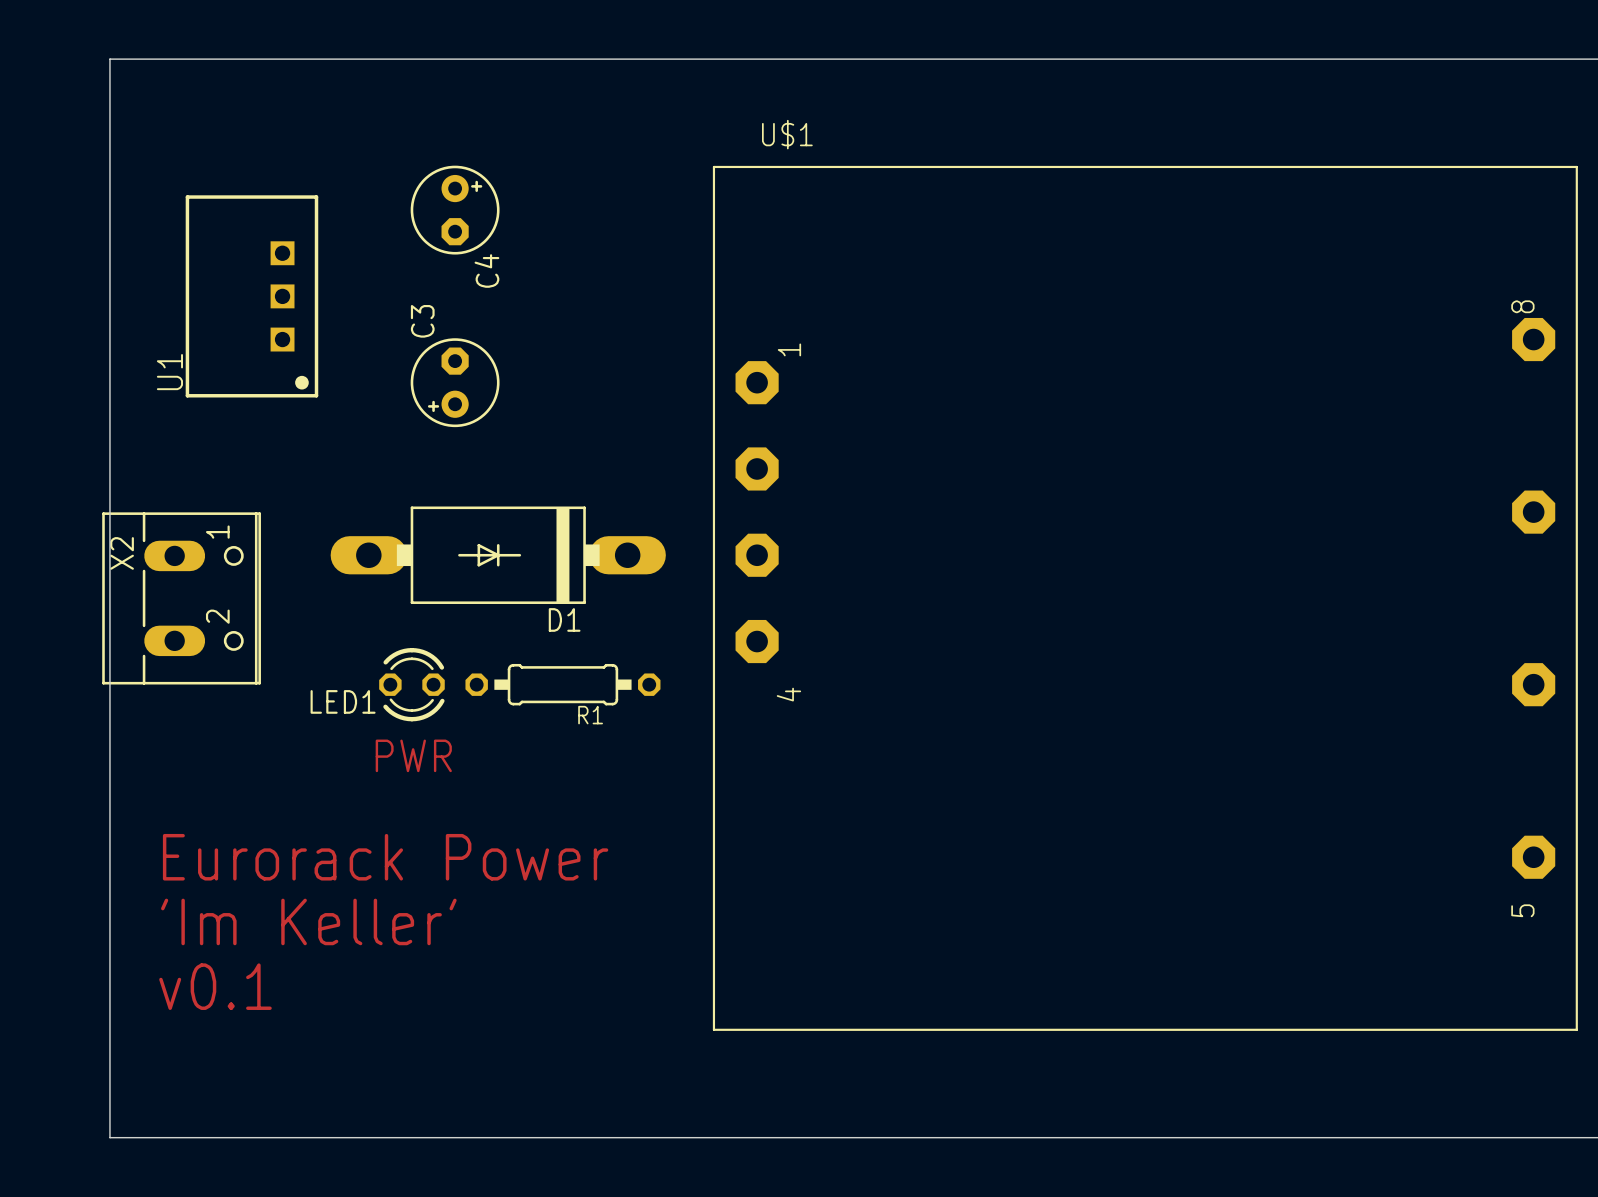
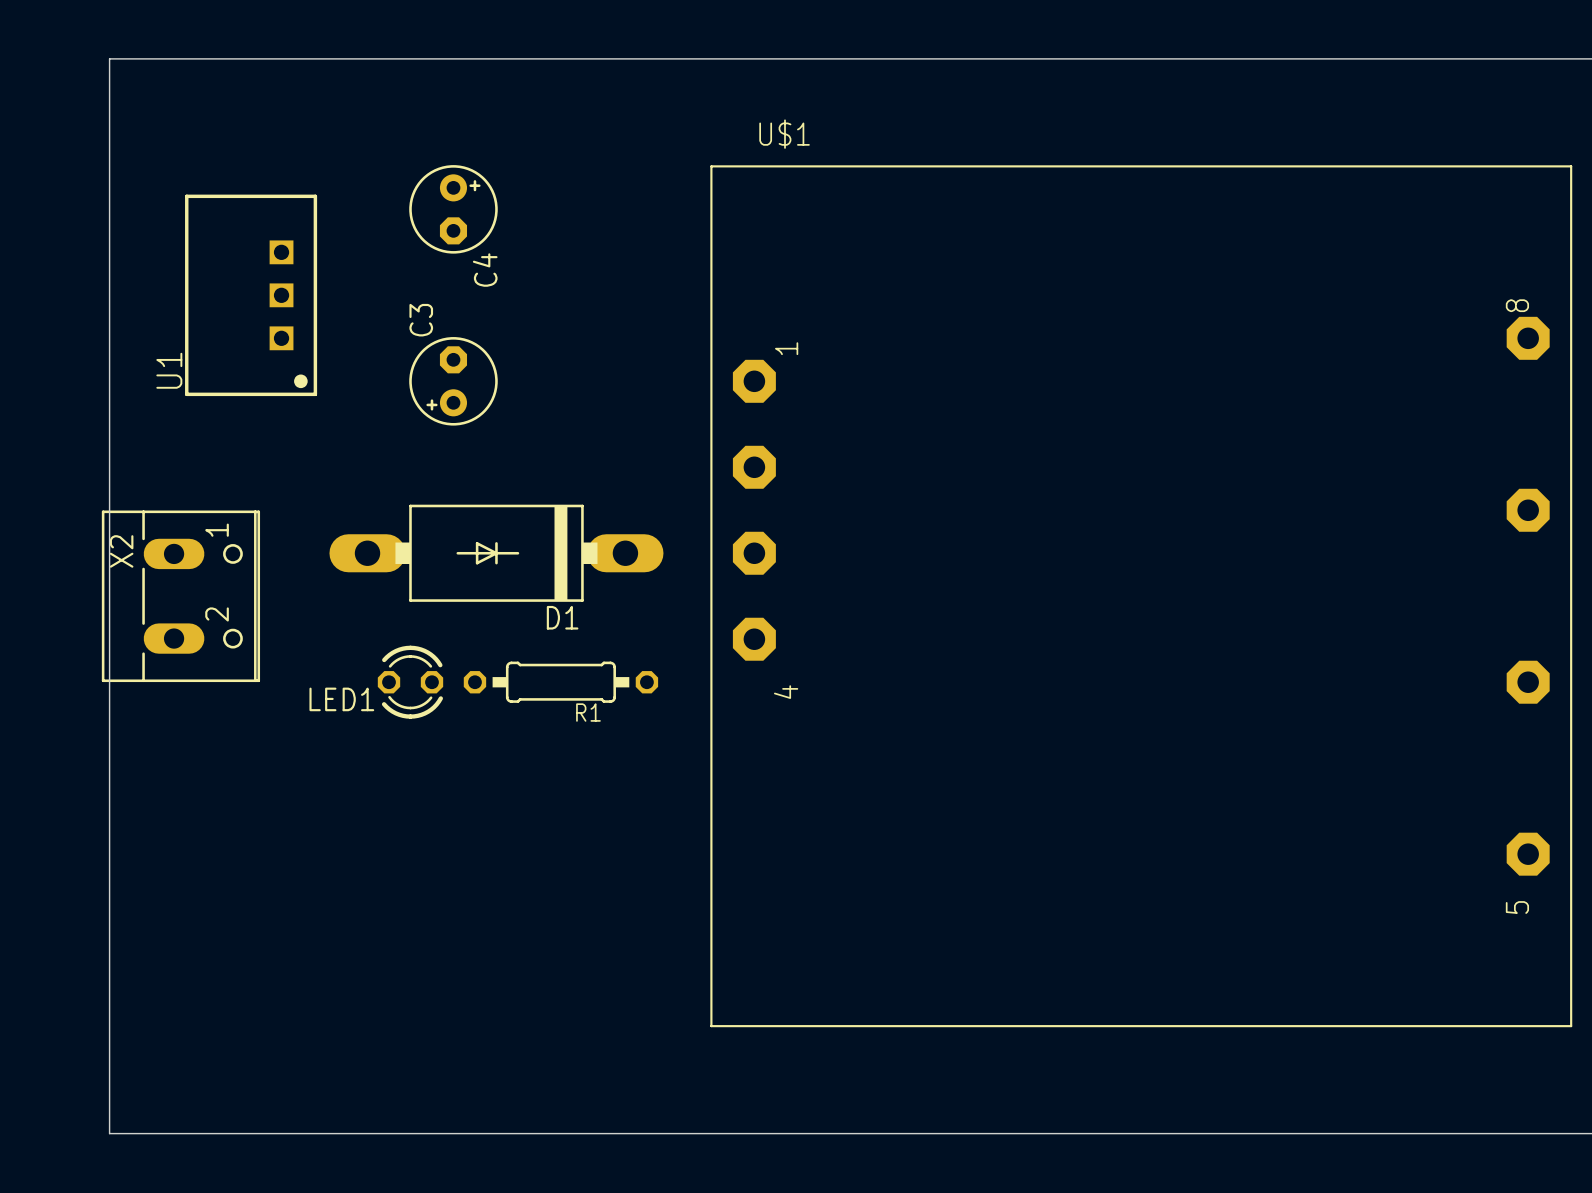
text: PWR (413, 755) -> none
text: Eurorack Power (385, 857) -> none
text: 'Im Keller' (308, 921) -> none
text: v0.1 (215, 986) -> none

